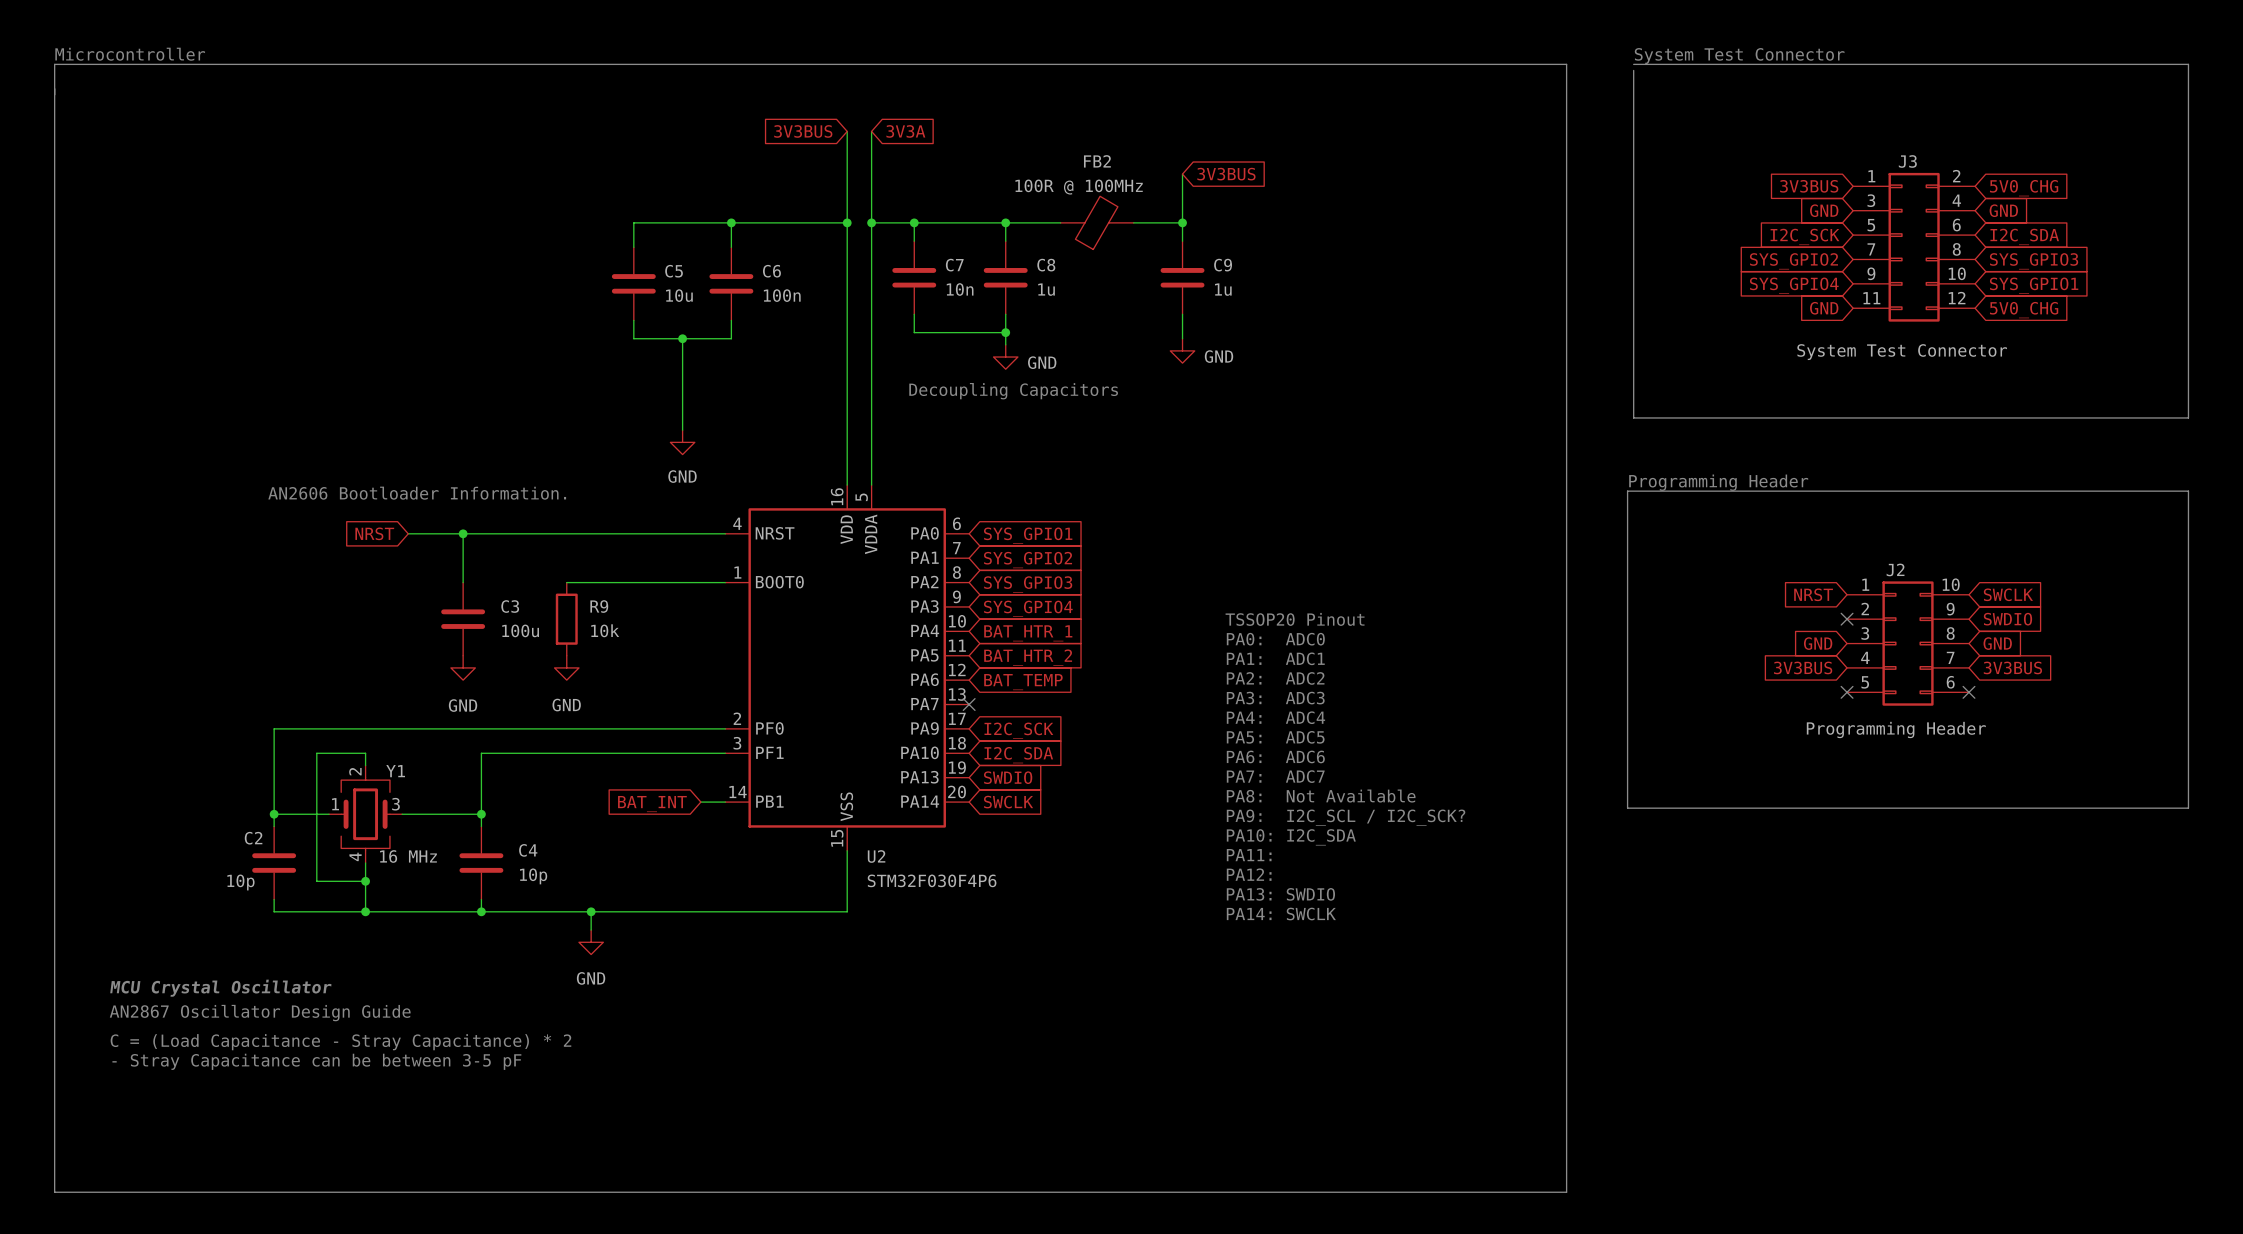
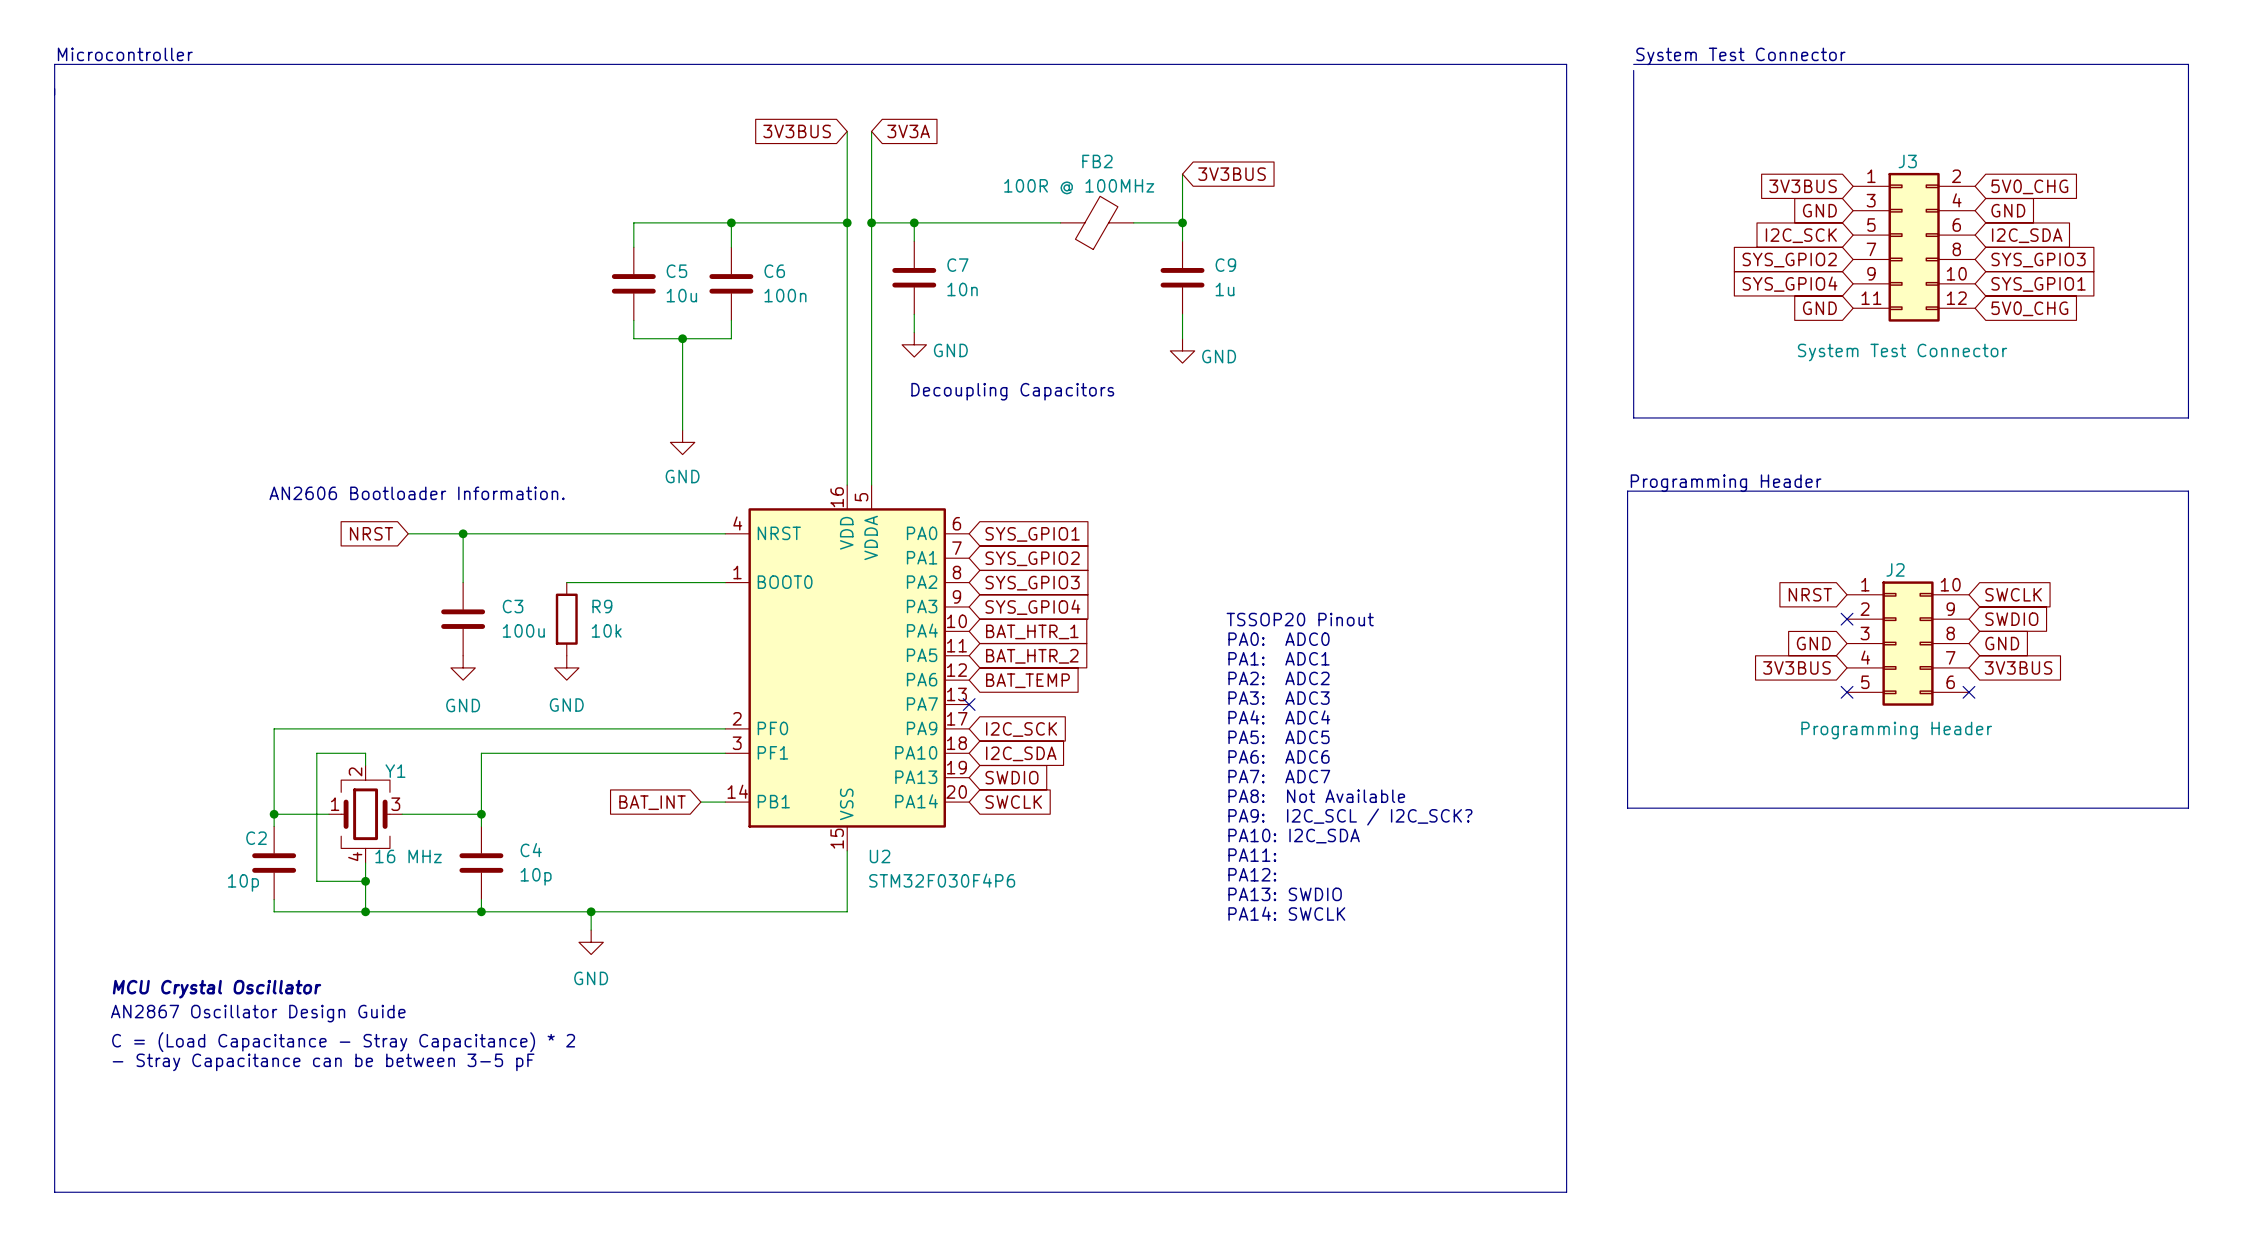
wire: (1005, 222) (1005, 241) -> none
junction: (1005, 222) -> none
C8: 1u (1005, 277) -> none
wire: (1005, 314) (1005, 344) -> none
wire: (914, 332) (1005, 332) -> none
junction: (1005, 332) -> none
power symbol position: GND (1005, 357) -> GND (914, 344)

